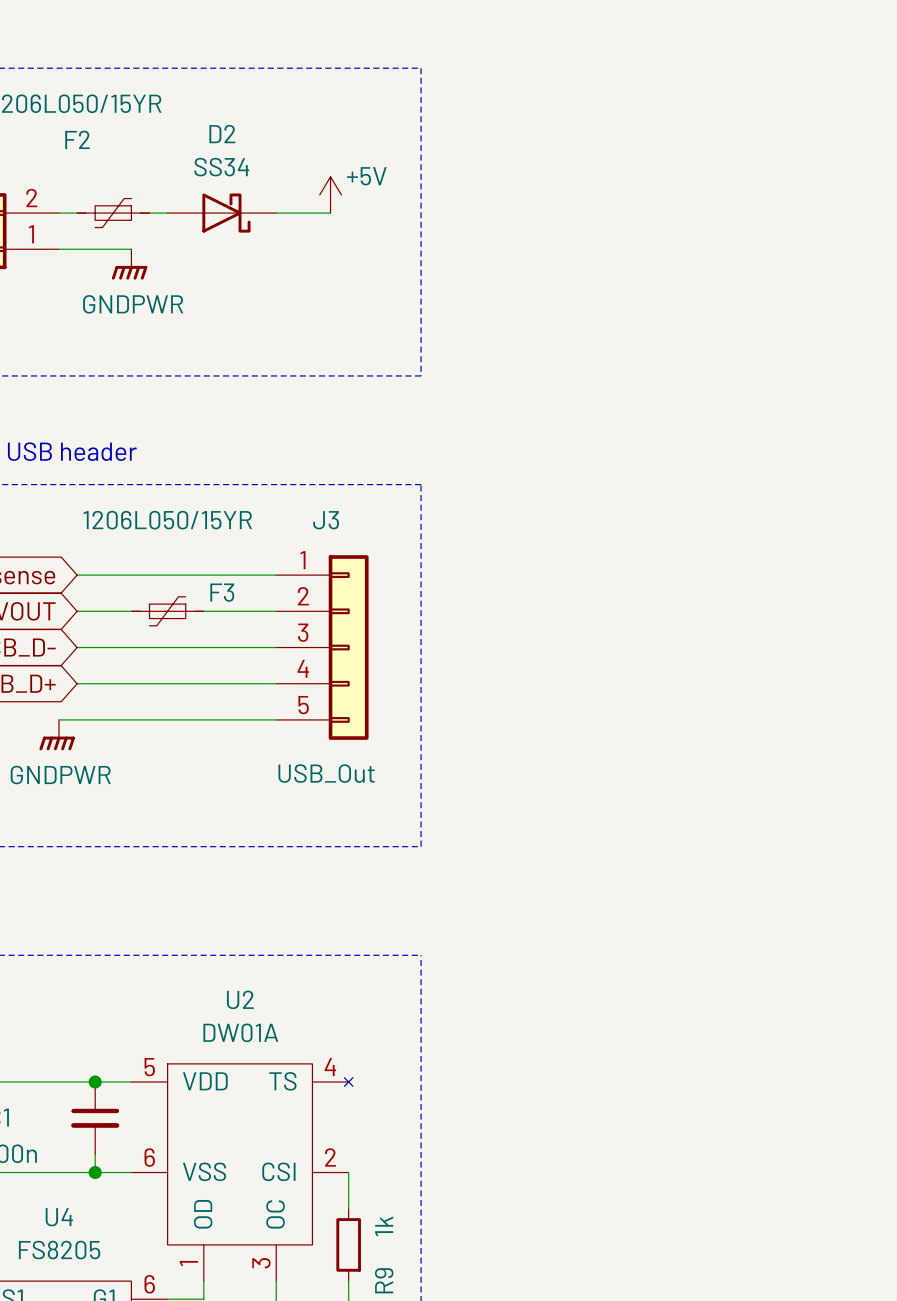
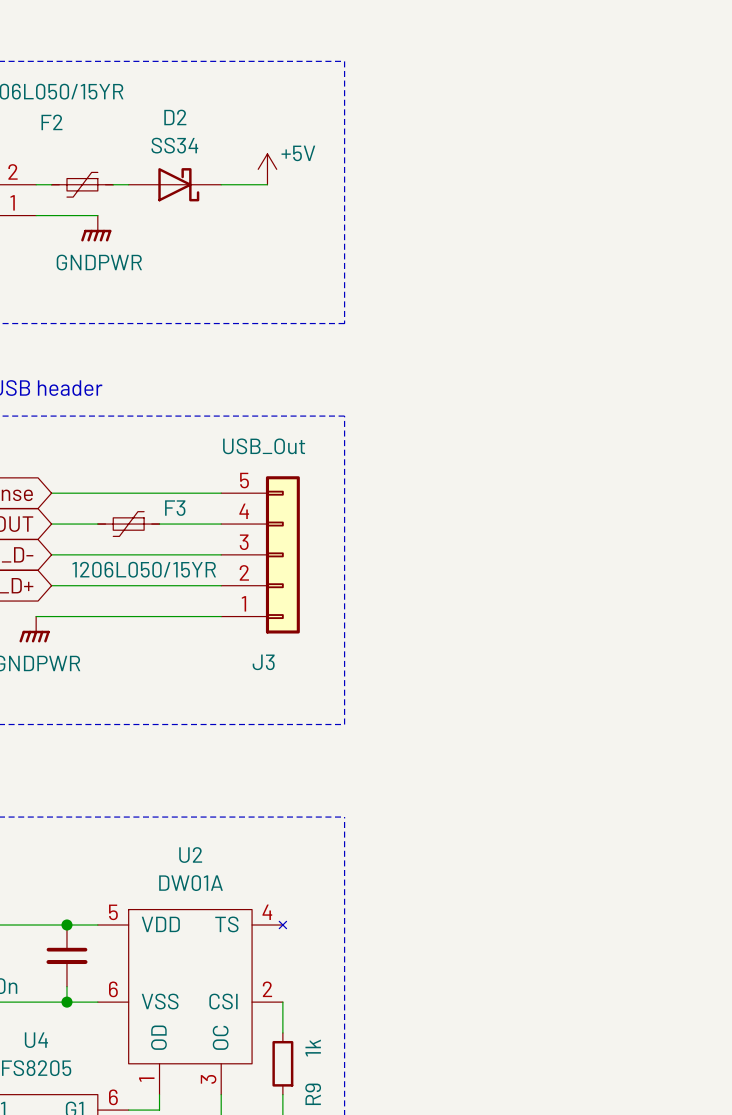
F3 value position: 1206L050/15YR (167, 520) -> 1206L050/15YR (144, 569)
J3 flip: as is (348, 647) -> up-down (282, 554)

